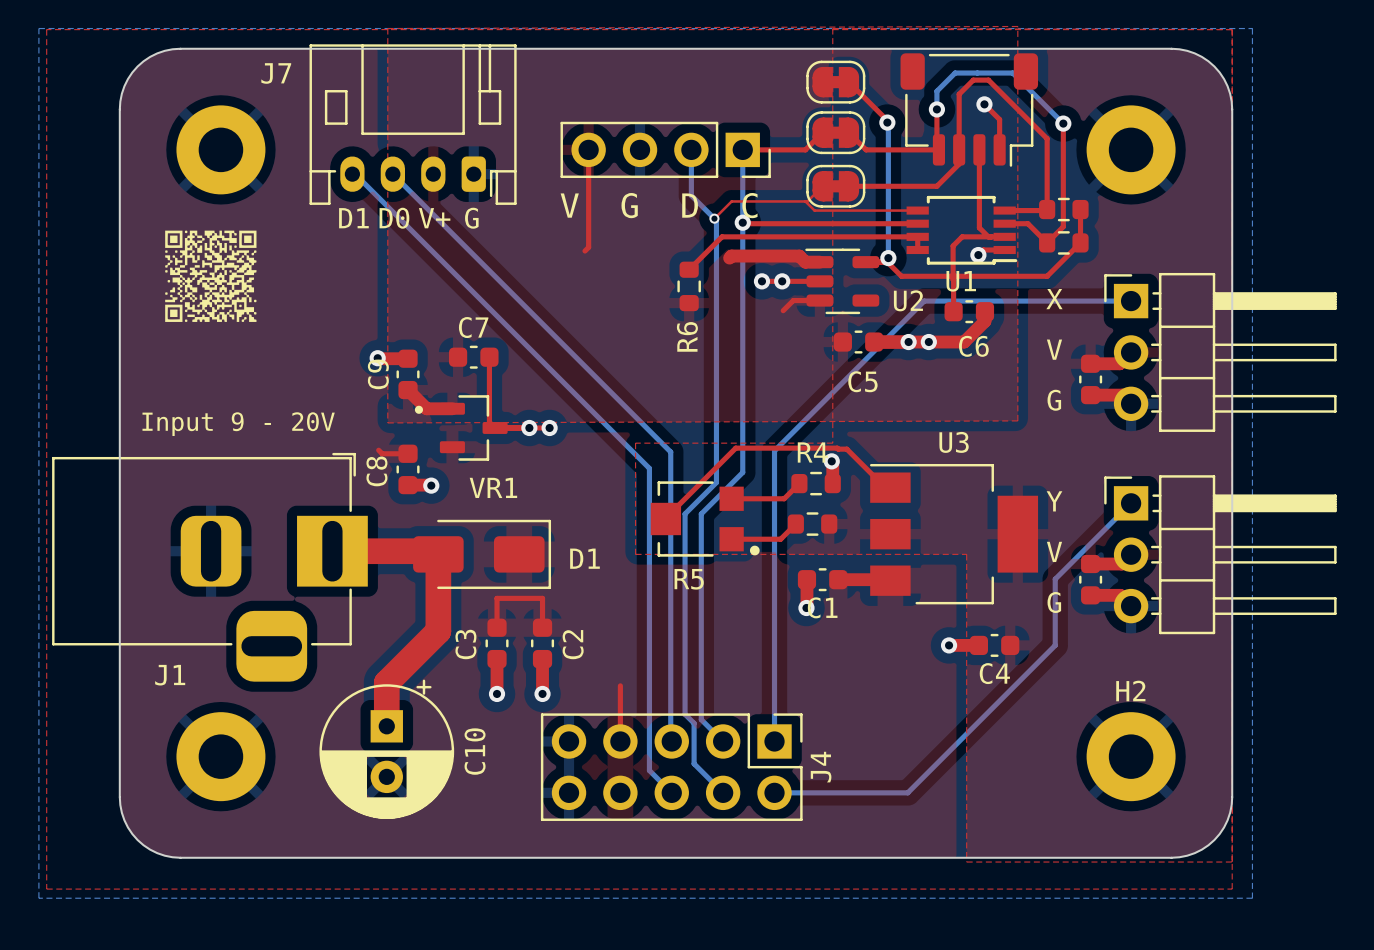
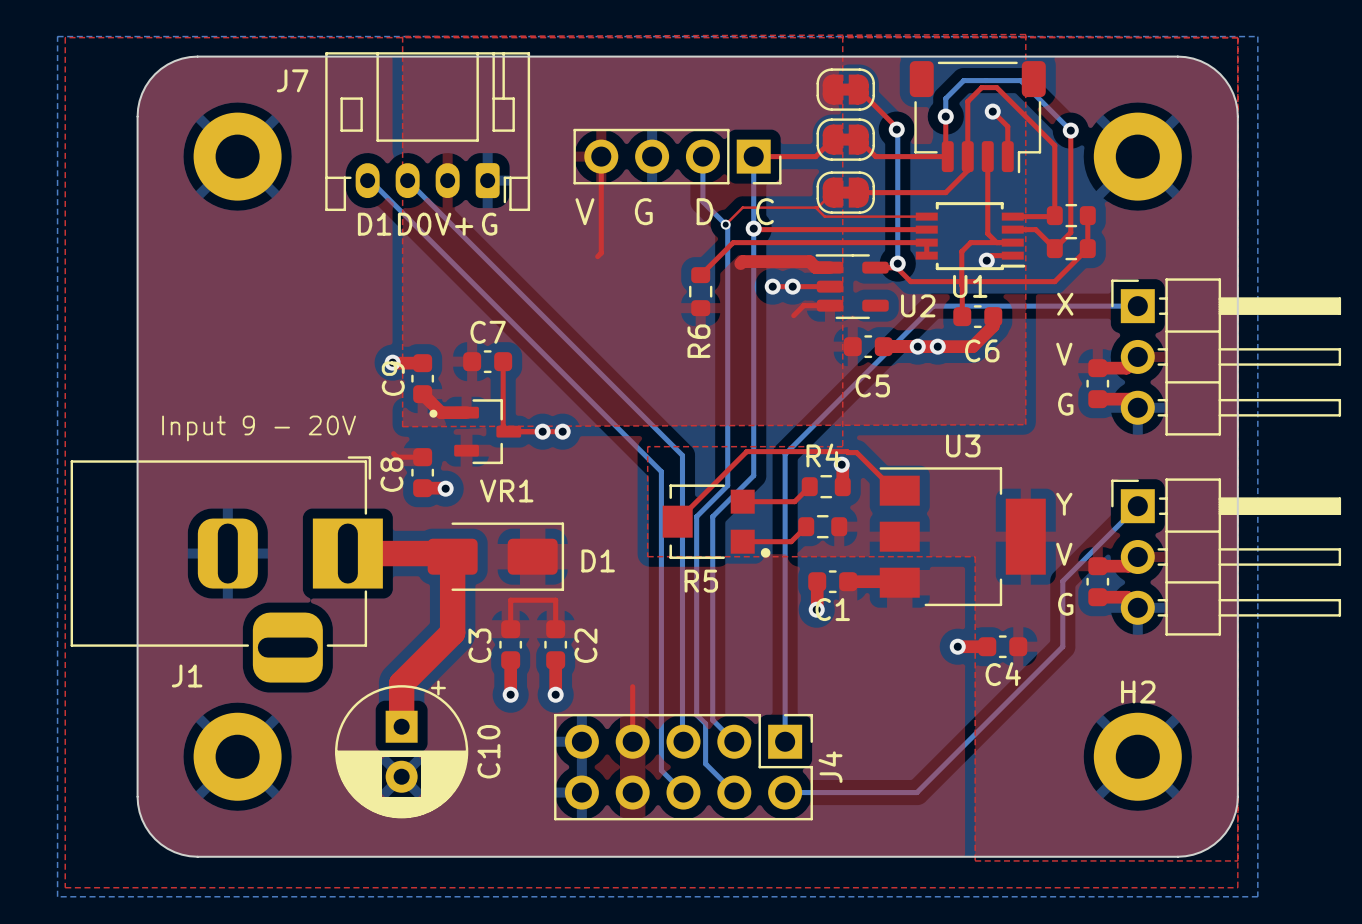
drawing: [165, 230, 257, 322] -> none

